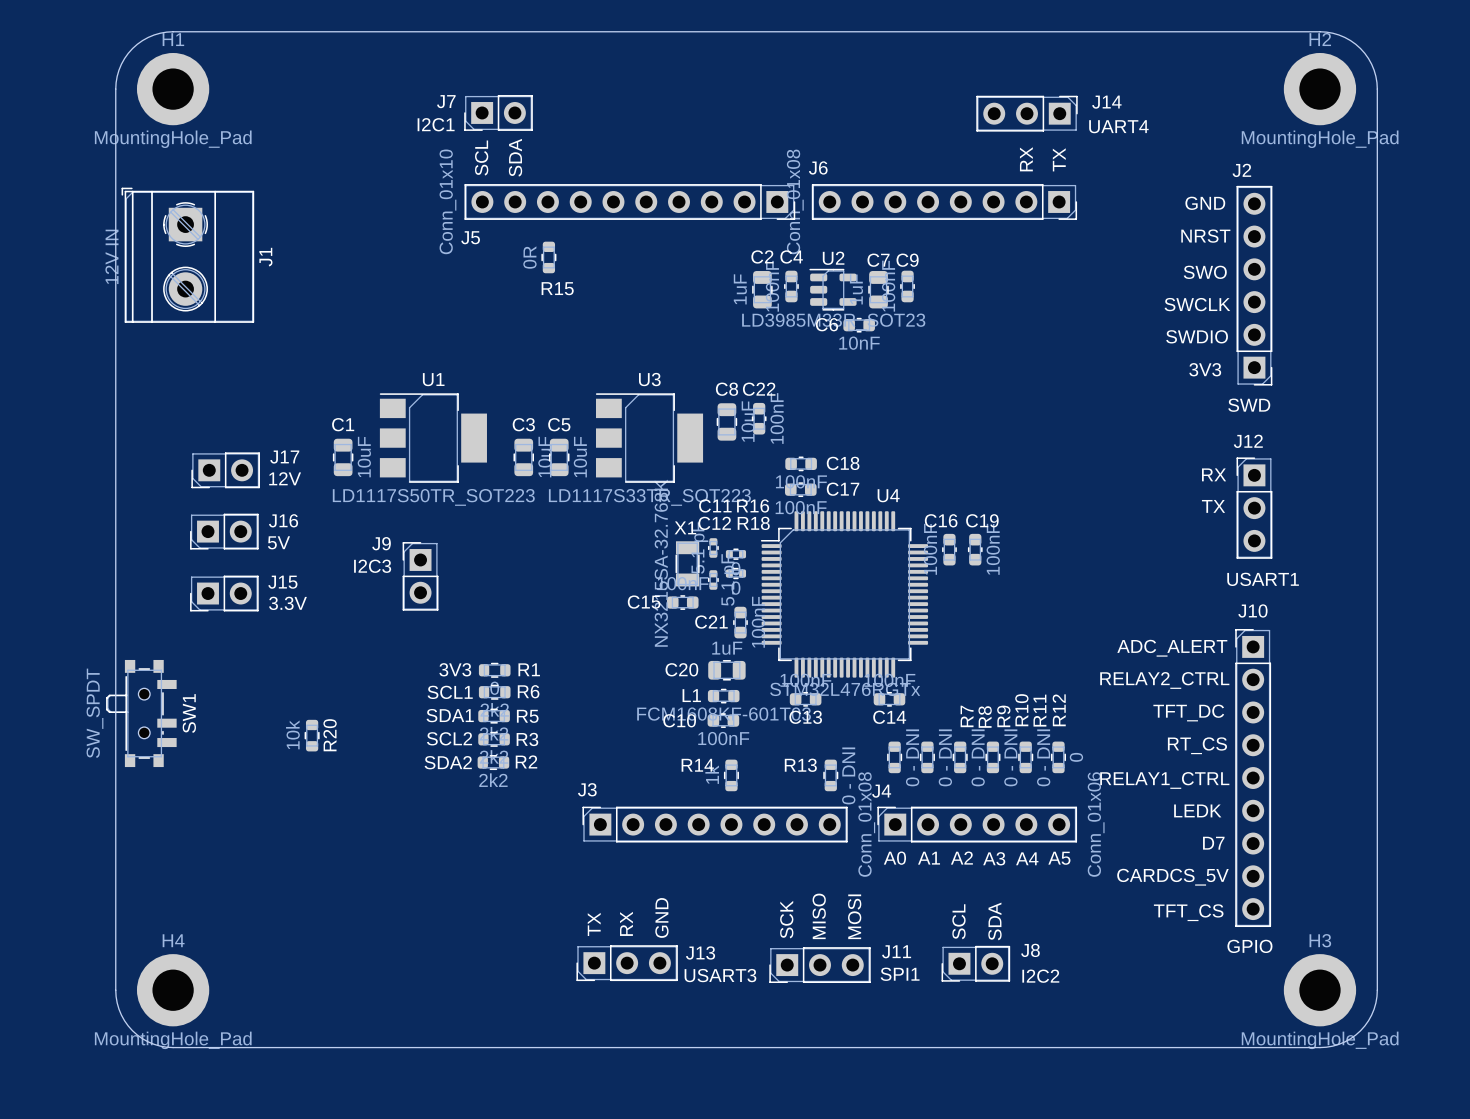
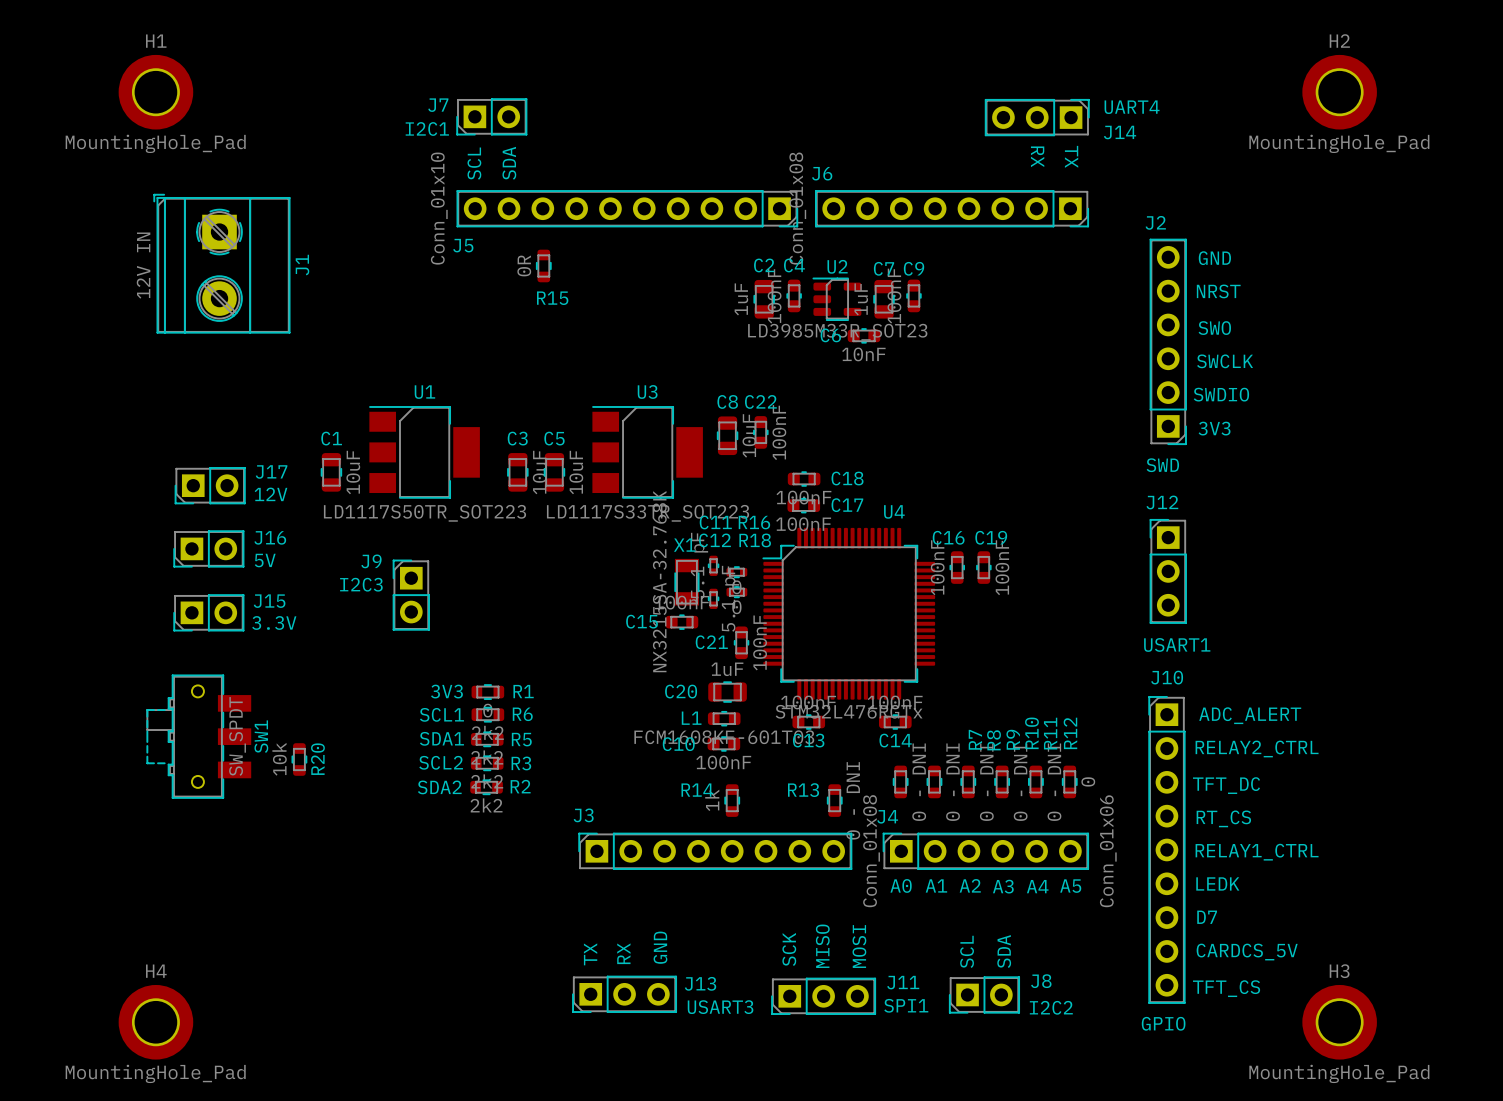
board edge: (173, 31) (1319, 31) (1338, 34) (1355, 44) (1371, 64) (1377, 89) (1377, 990) (1374, 1009) (1364, 1025) (1344, 1041) (1319, 1047) (173, 1047) (154, 1044) (137, 1035) (121, 1015) (115, 990) (115, 89) (118, 70) (132, 48) (154, 34) (173, 31) -> none
J14 name position: J14 (1106, 102) -> J14 (1120, 132)
J14 value position: UART4 (1118, 126) -> UART4 (1132, 107)
J14 text rotation: 0° (1026, 159) -> 180° (1037, 156)
J14 text rotation: 0° (1059, 159) -> 180° (1071, 156)
J2 text position: GND (1205, 203) -> GND (1214, 258)
J2 text position: NRST (1205, 236) -> NRST (1218, 291)
J1 position: (187, 255) -> (221, 263)
J2 text position: SWO (1205, 272) -> SWO (1214, 328)
J2 position: (1254, 285) -> (1168, 341)
J2 text position: SWCLK (1197, 304) -> SWCLK (1225, 361)
J2 text position: SWDIO (1197, 336) -> SWDIO (1221, 394)
J2 text position: 3V3 (1205, 369) -> 3V3 (1214, 428)
J12 text: RX (1214, 474) -> none
J12 text: TX (1213, 506) -> none
J12 position: (1254, 508) -> (1168, 571)
J10 footprint: [1235, 629, 1272, 928] -> [1148, 696, 1186, 1004]
SW1 footprint: [106, 659, 177, 768] -> [146, 674, 252, 799]
SW1 value position: SW_SPDT (94, 713) -> SW_SPDT (237, 736)

